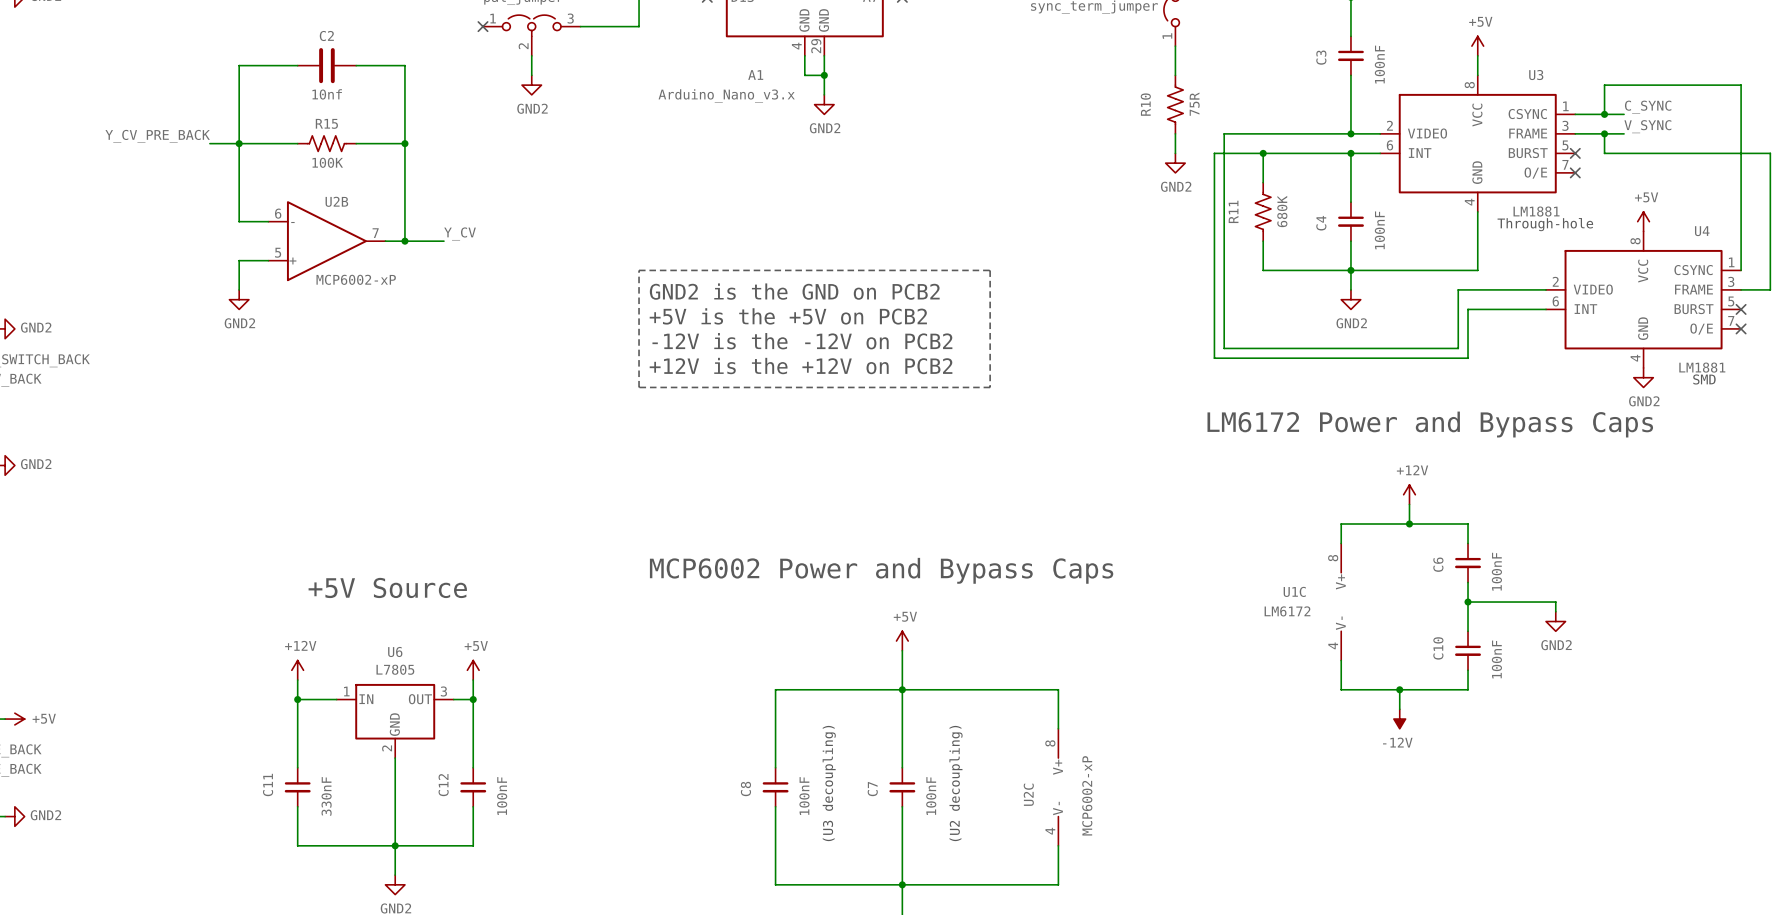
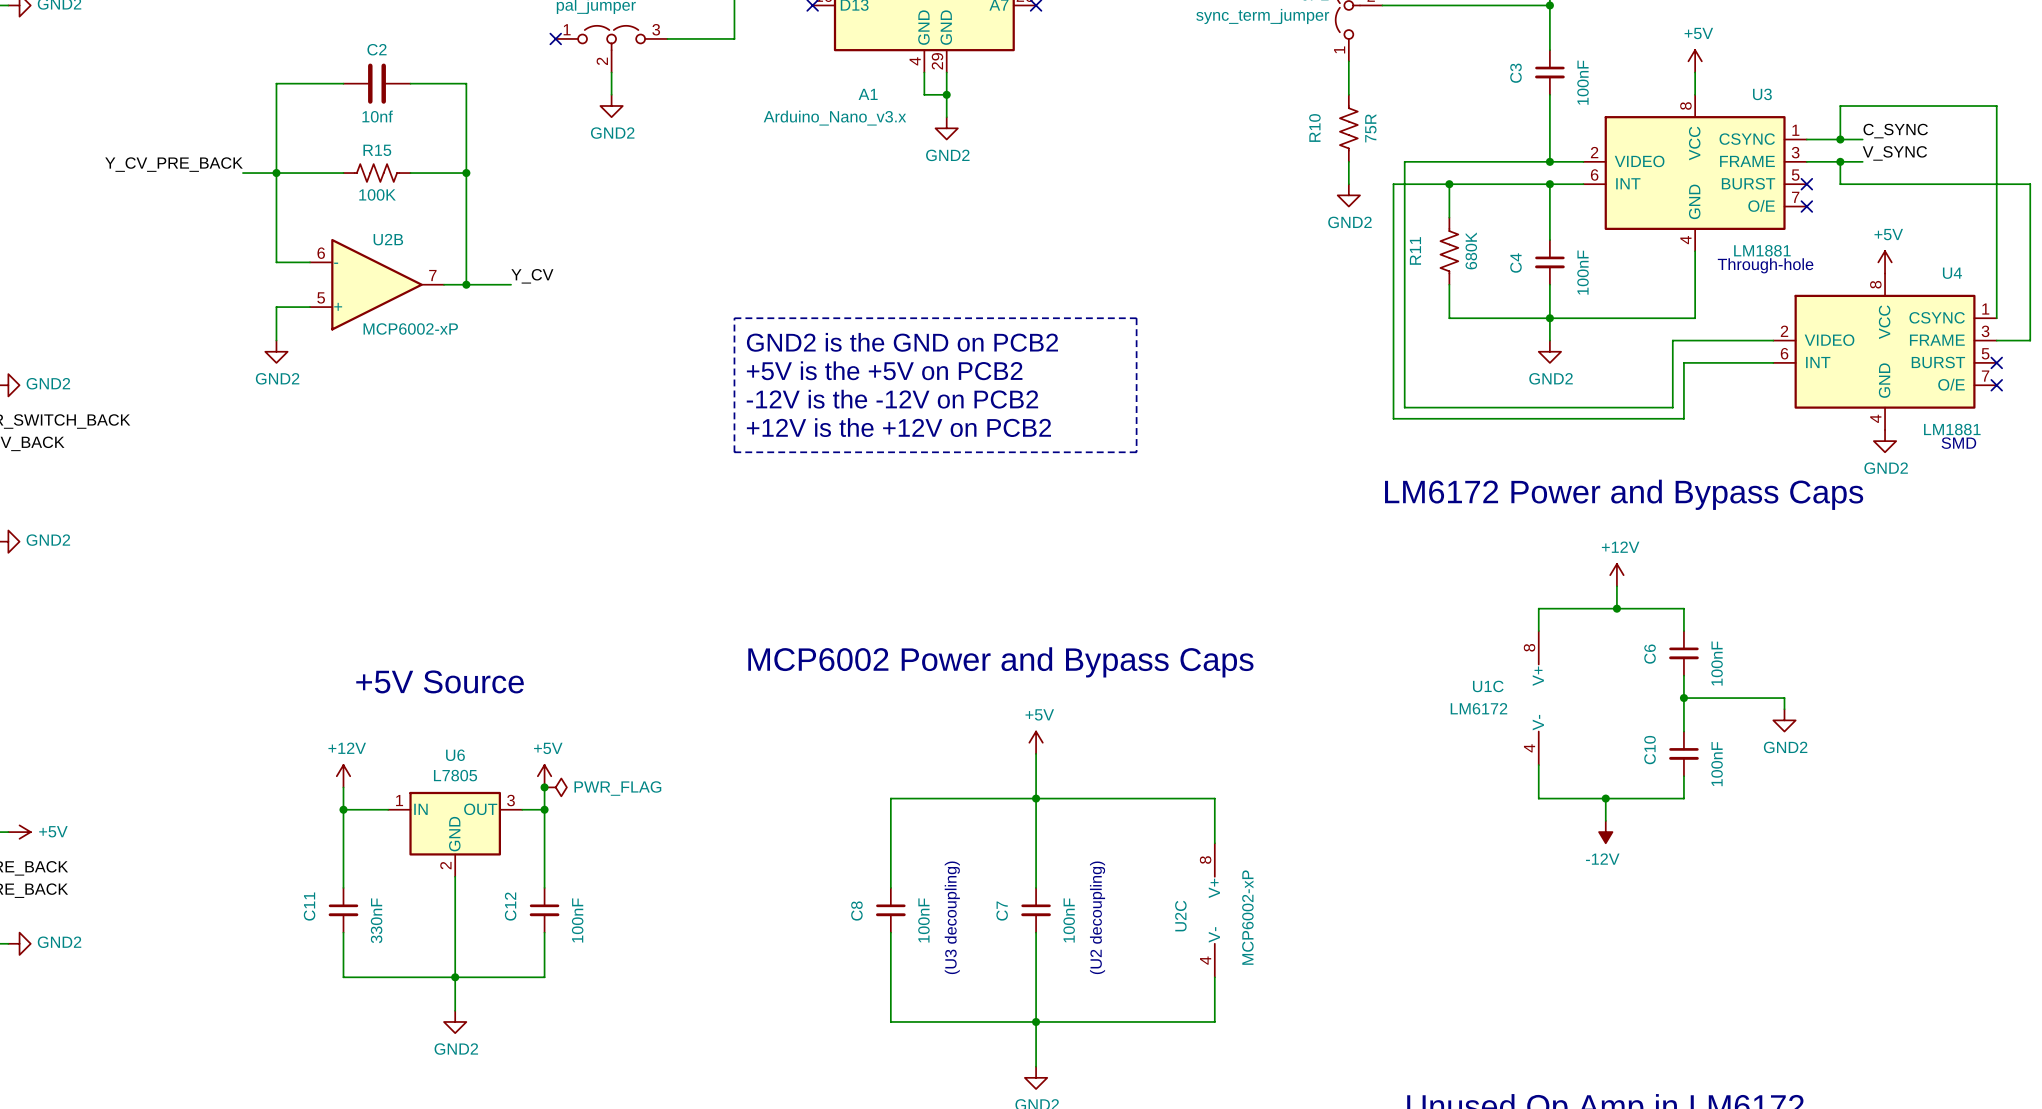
junction: none -> (544, 787)
power symbol: none -> PWR_FLAG (555, 787)

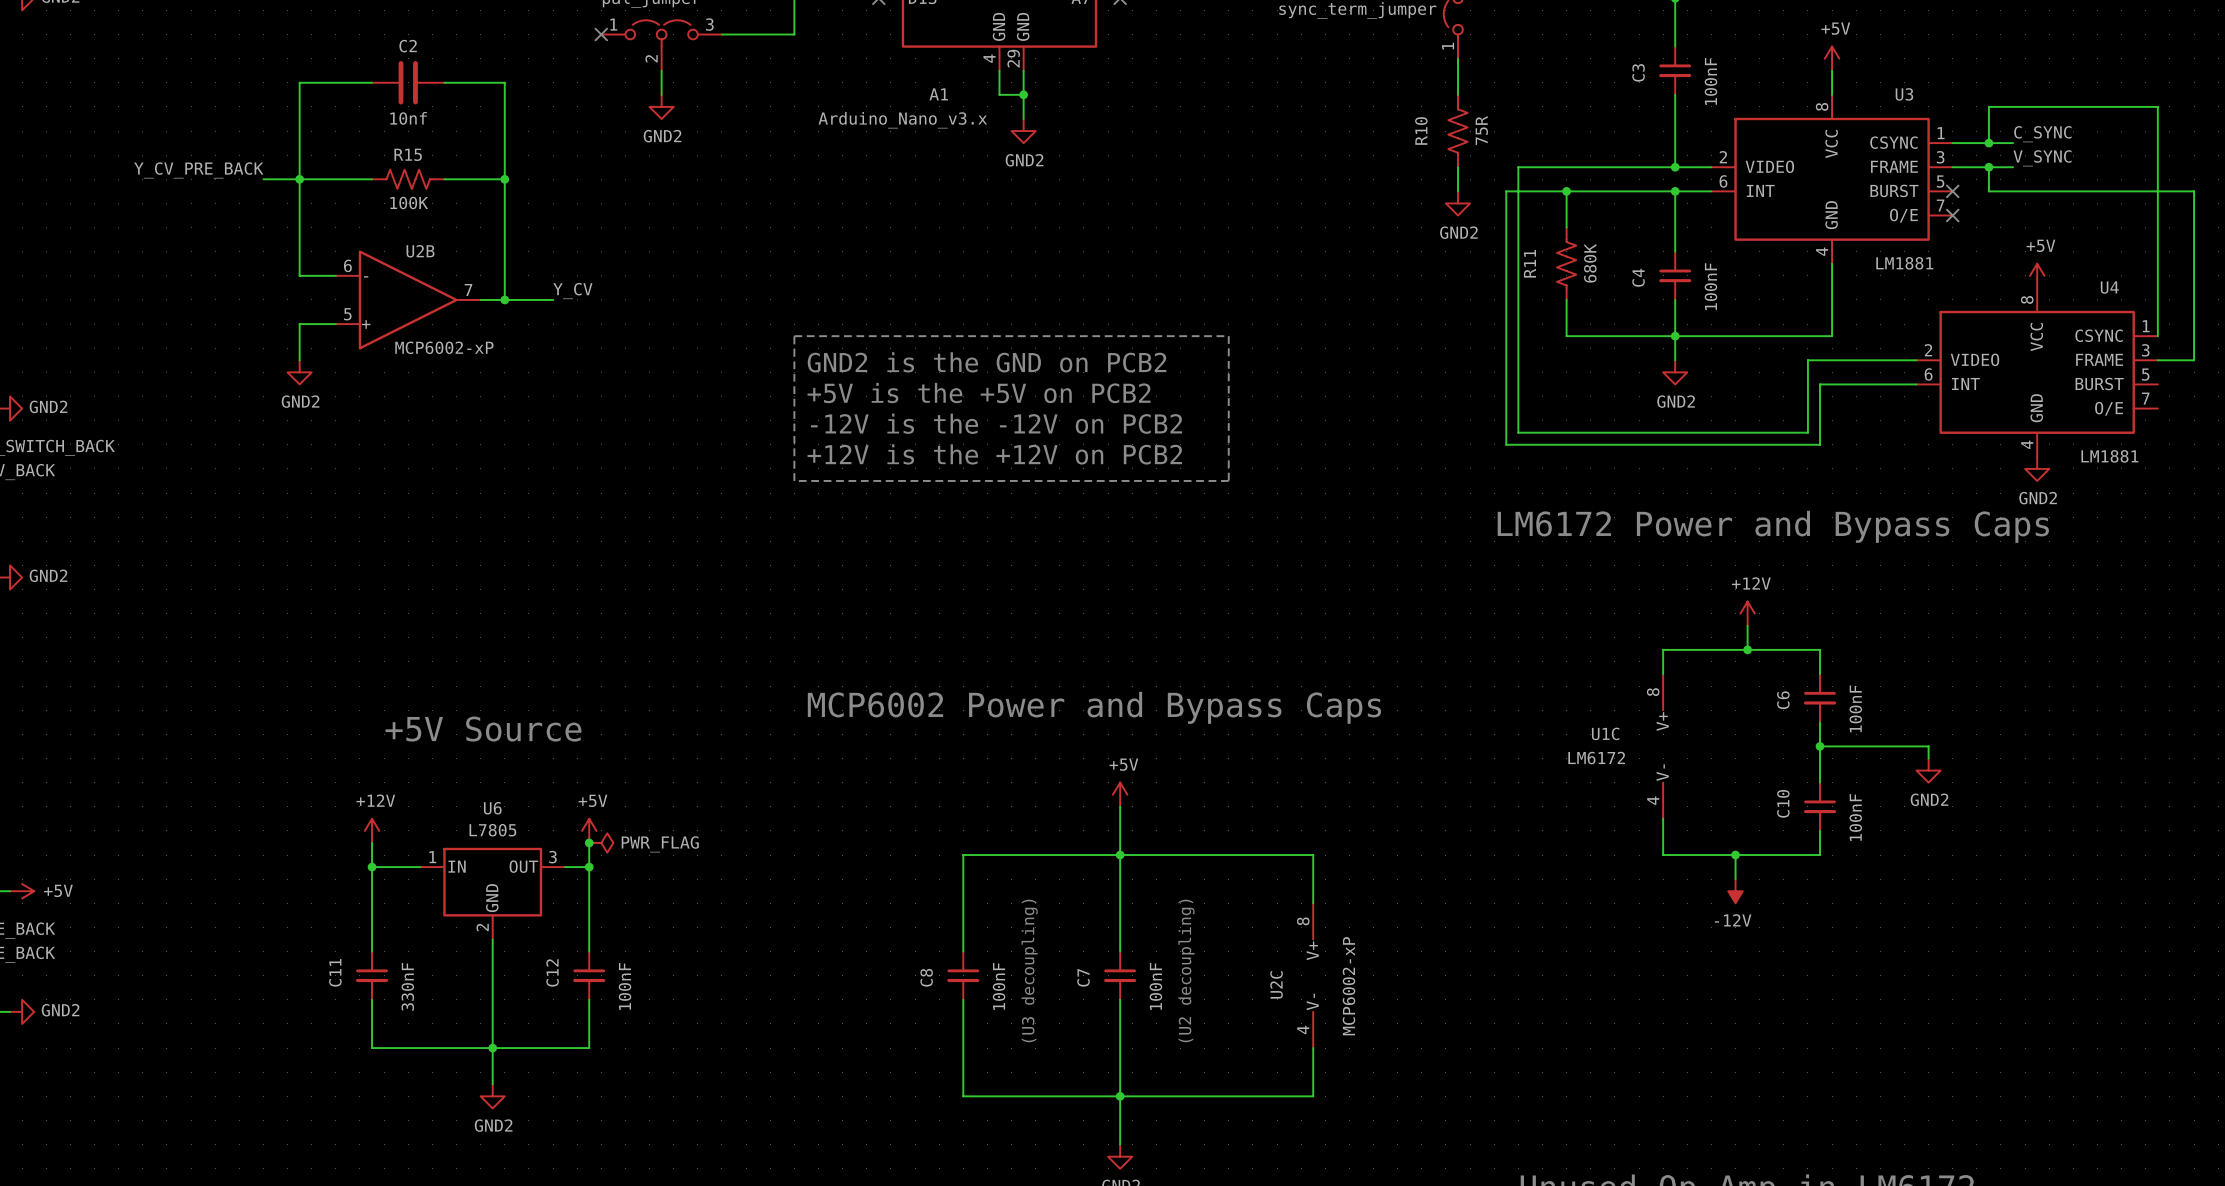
text: Through-hole (1765, 265) -> none
no-connect mark: (1996, 362) -> none
no-connect mark: (1996, 385) -> none
text: SMD (1958, 443) -> none

